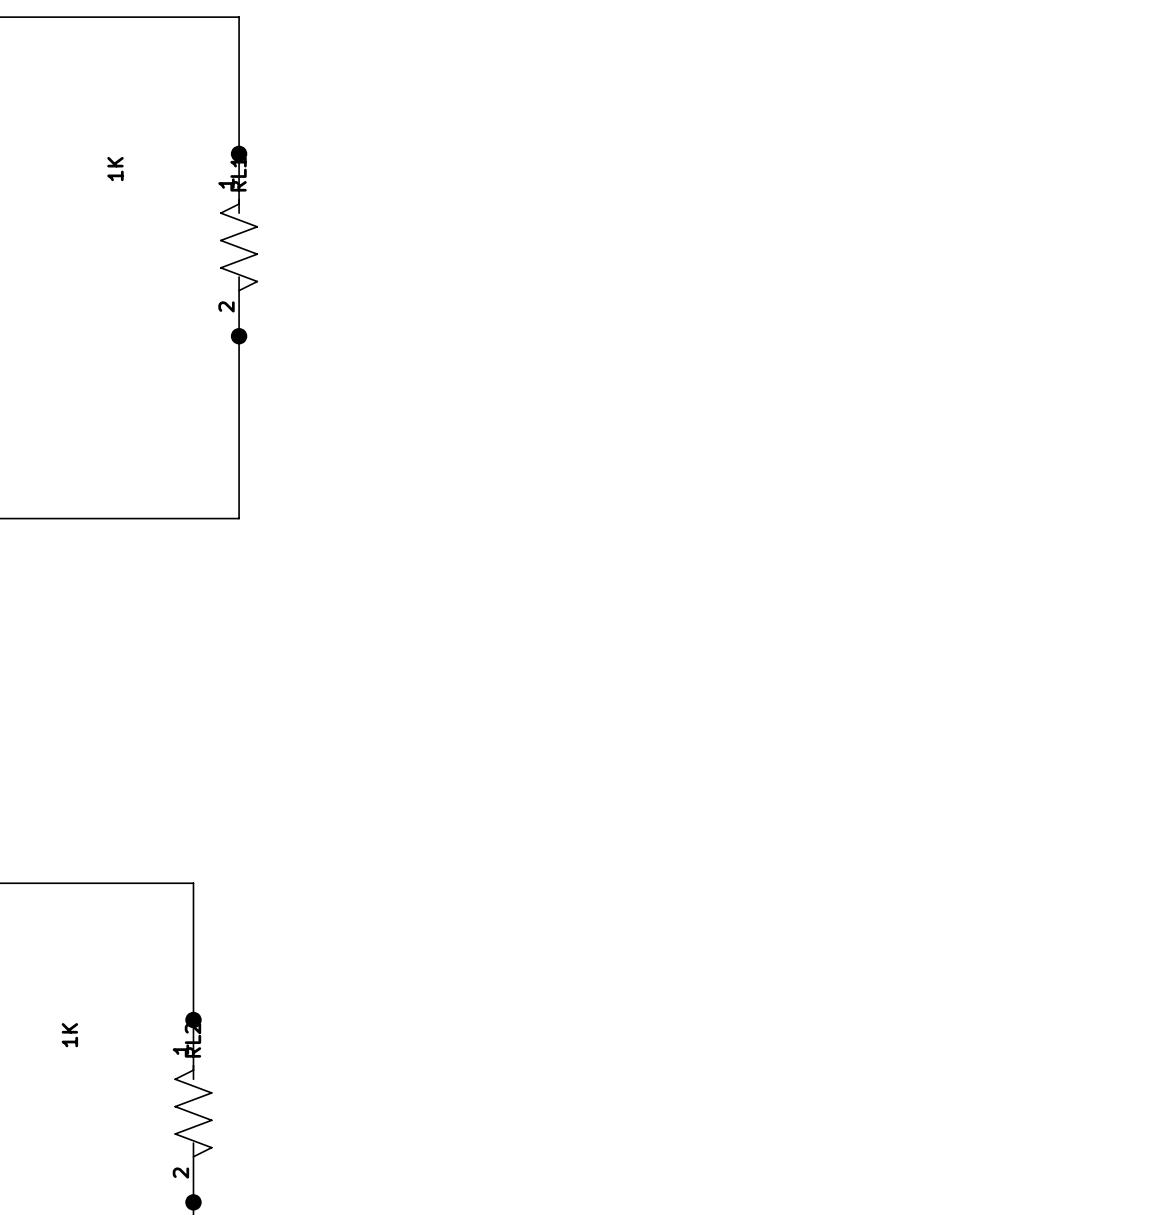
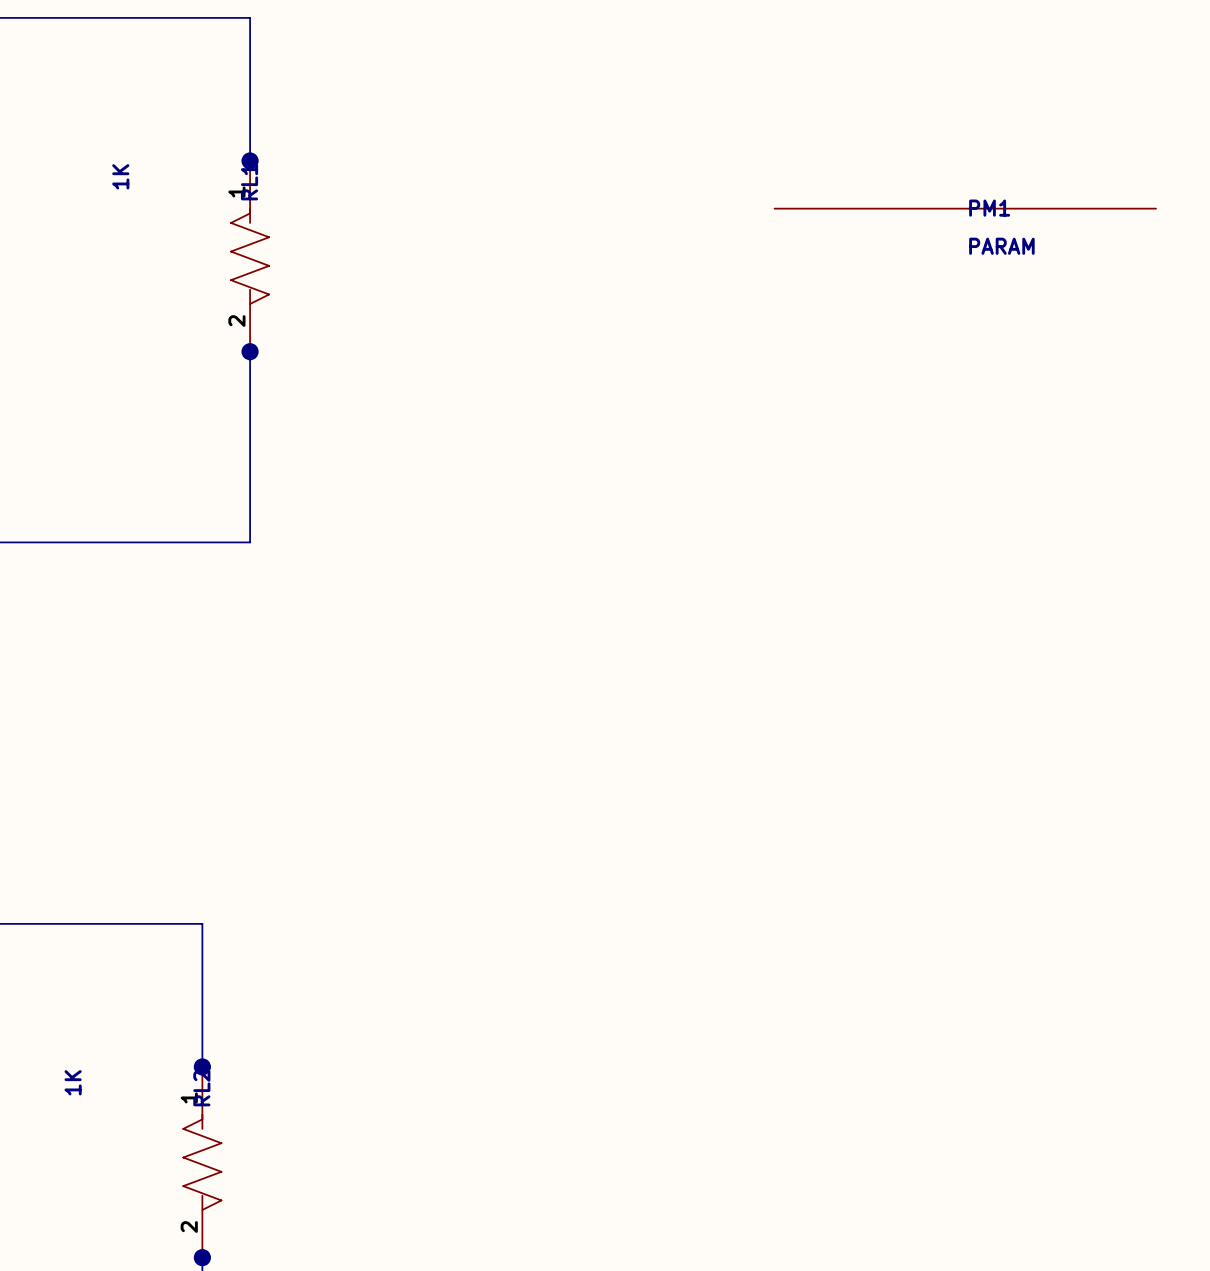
PM1: none -> PARAM (965, 208)

